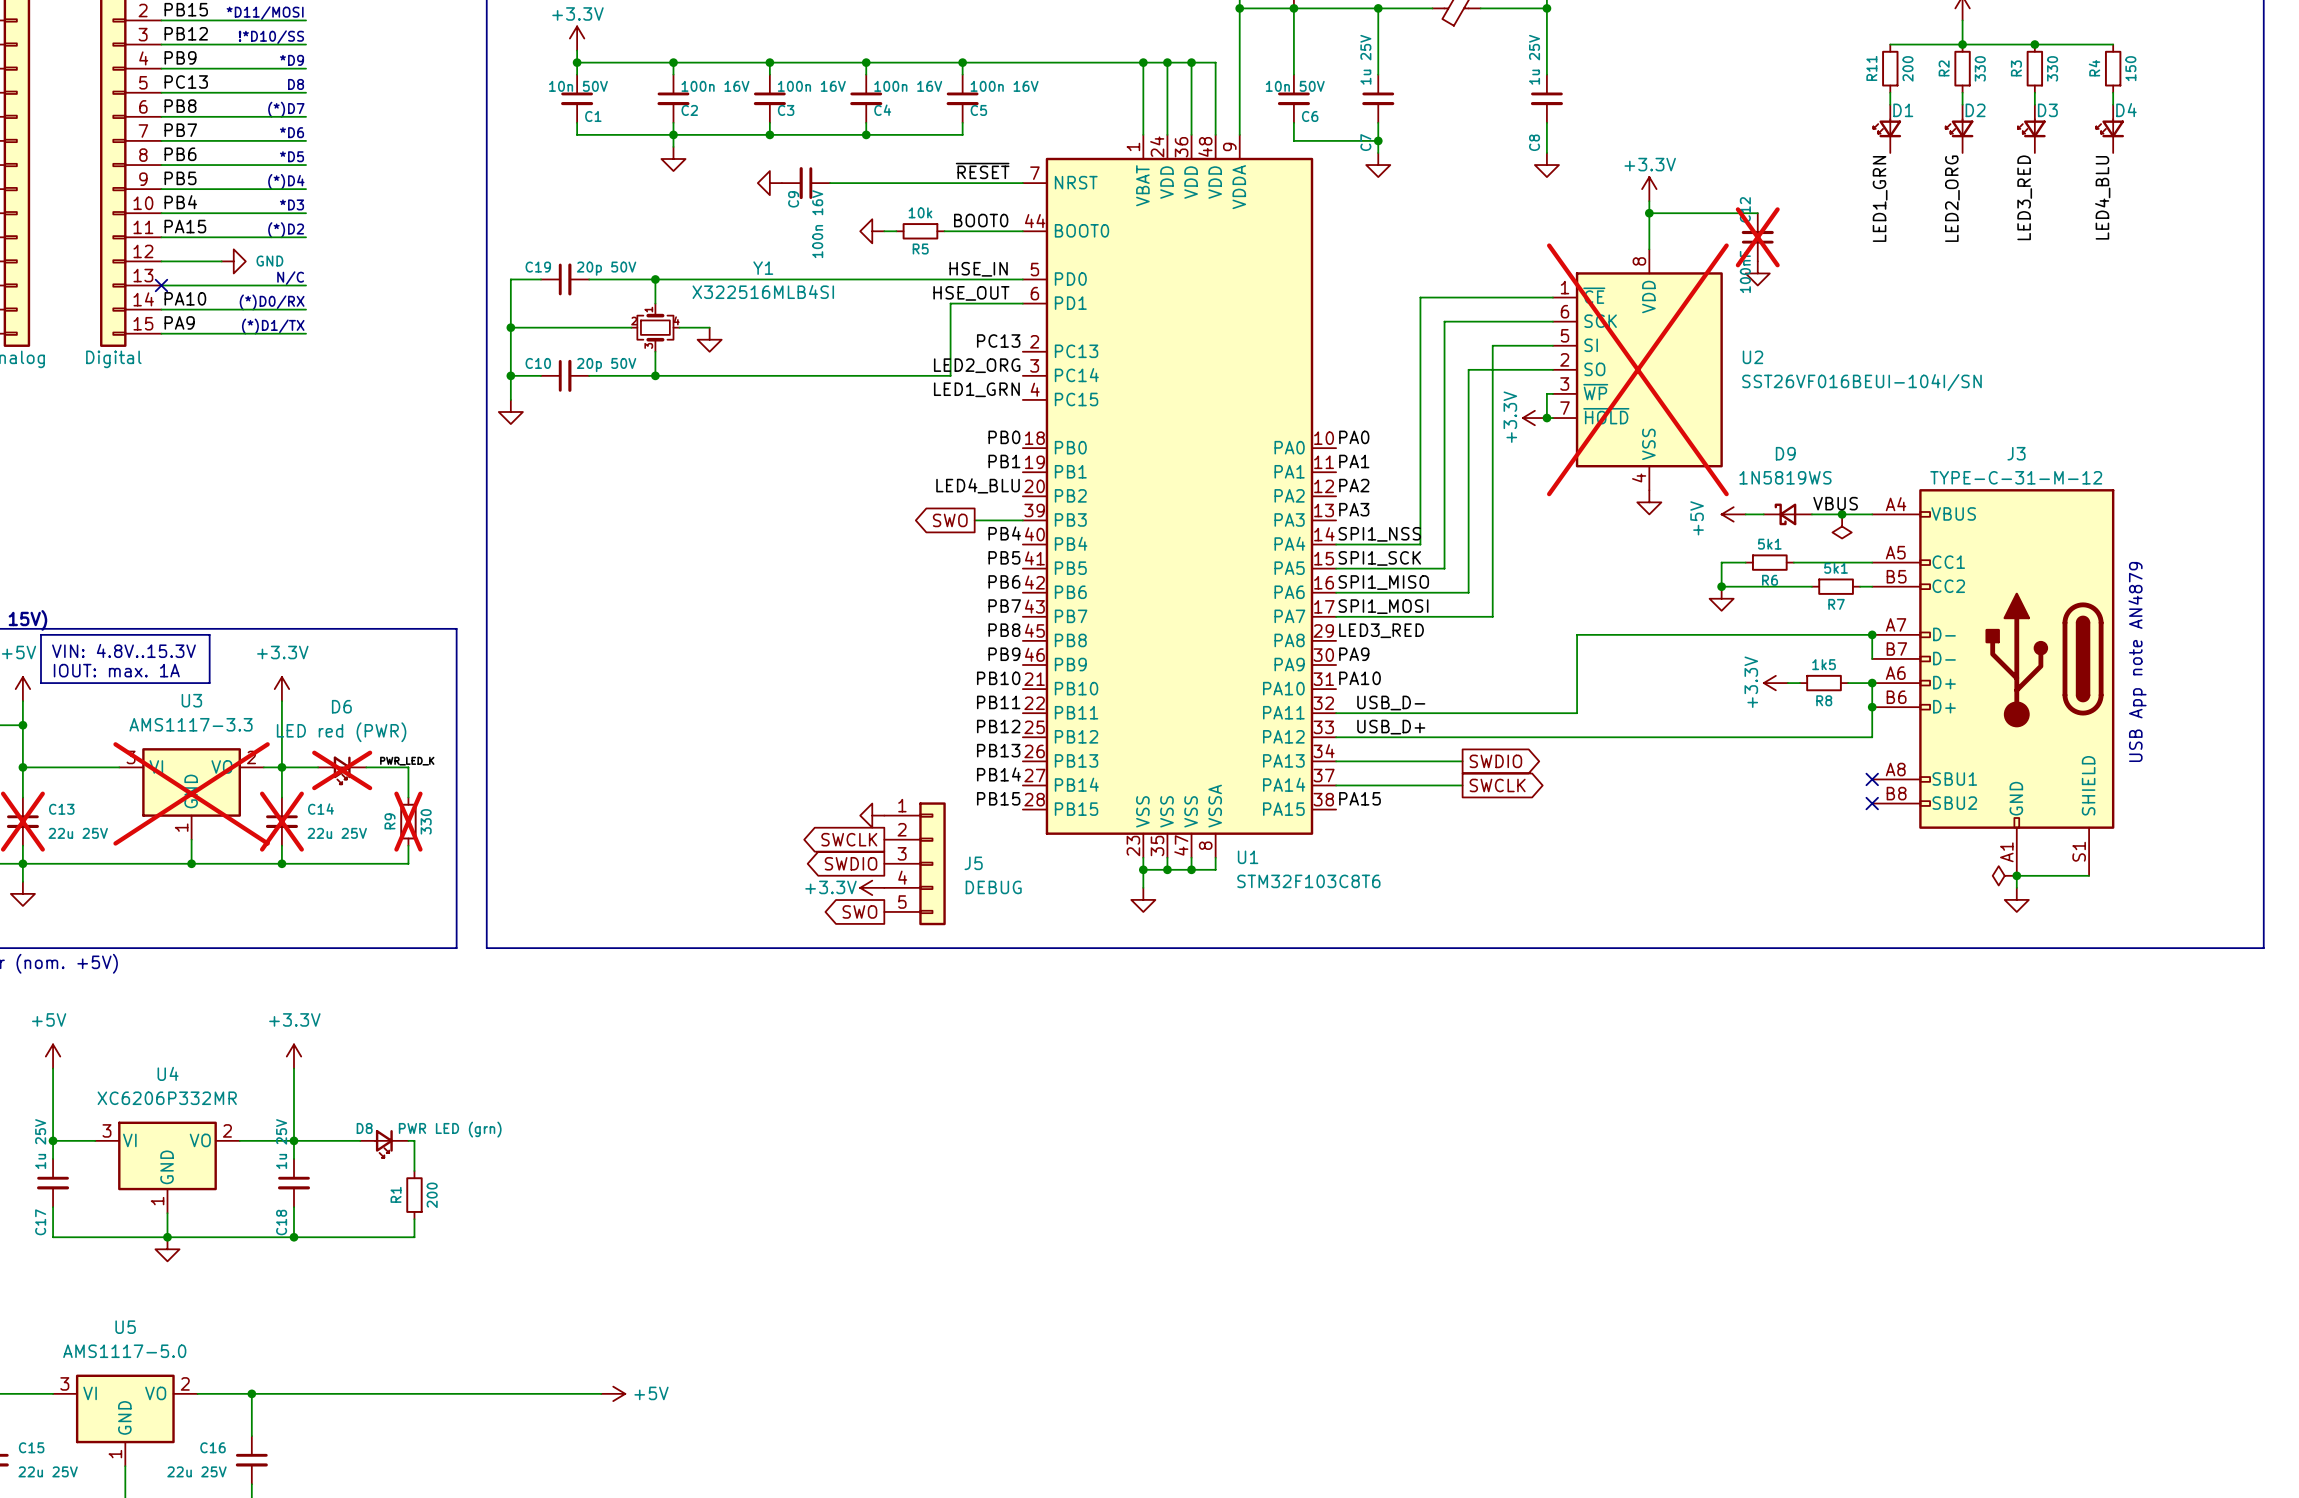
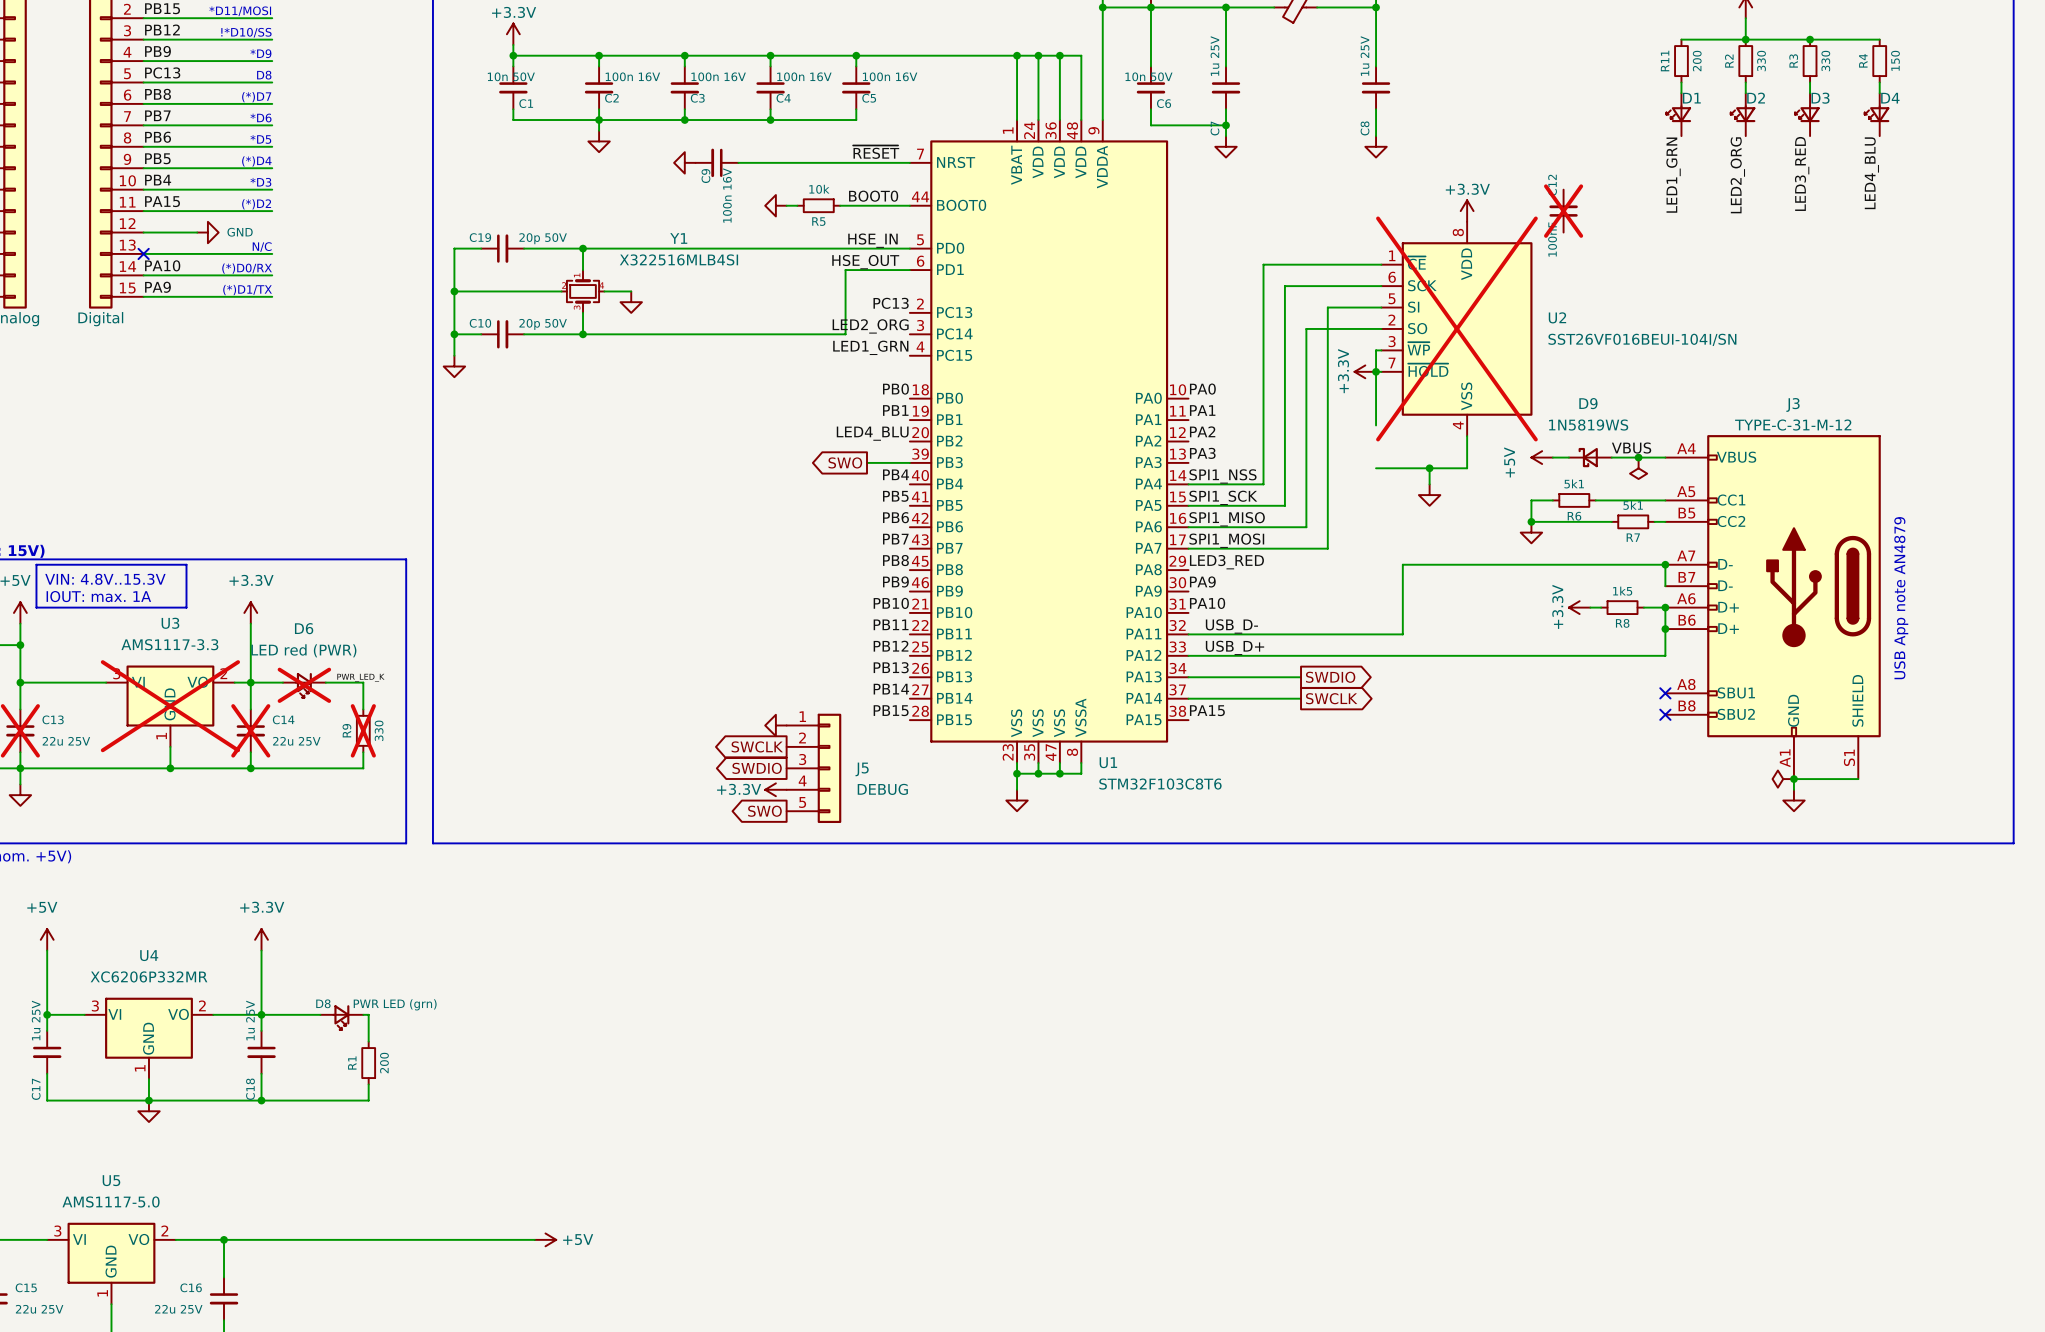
power symbol position: +3.3V (1649, 189) -> +3.3V (1467, 211)
wire: (1649, 213) (1757, 213) -> none
junction: (1649, 213) -> none
power symbol: (1757, 273) -> none
wire: none -> (1376, 371) (1376, 425)
wire: none -> (1467, 436) (1467, 468) (1376, 468)
power symbol position: (1649, 502) -> (1429, 495)
wire: none -> (1429, 468) (1429, 484)
junction: none -> (1429, 468)

